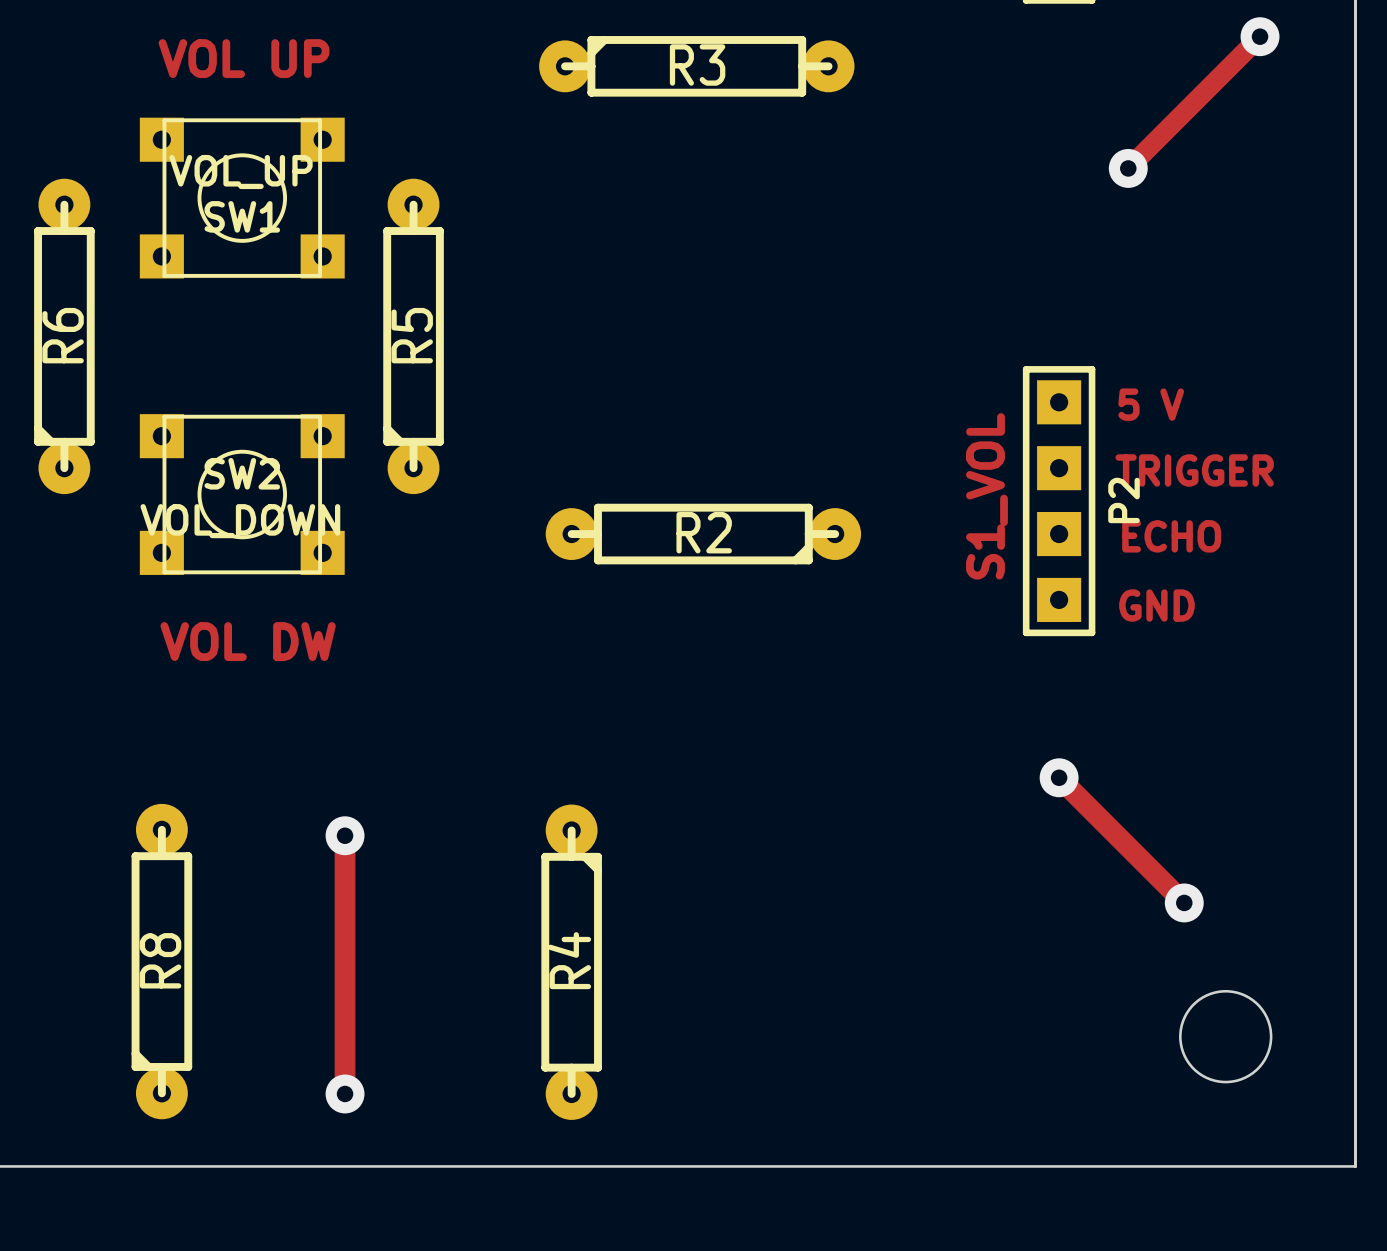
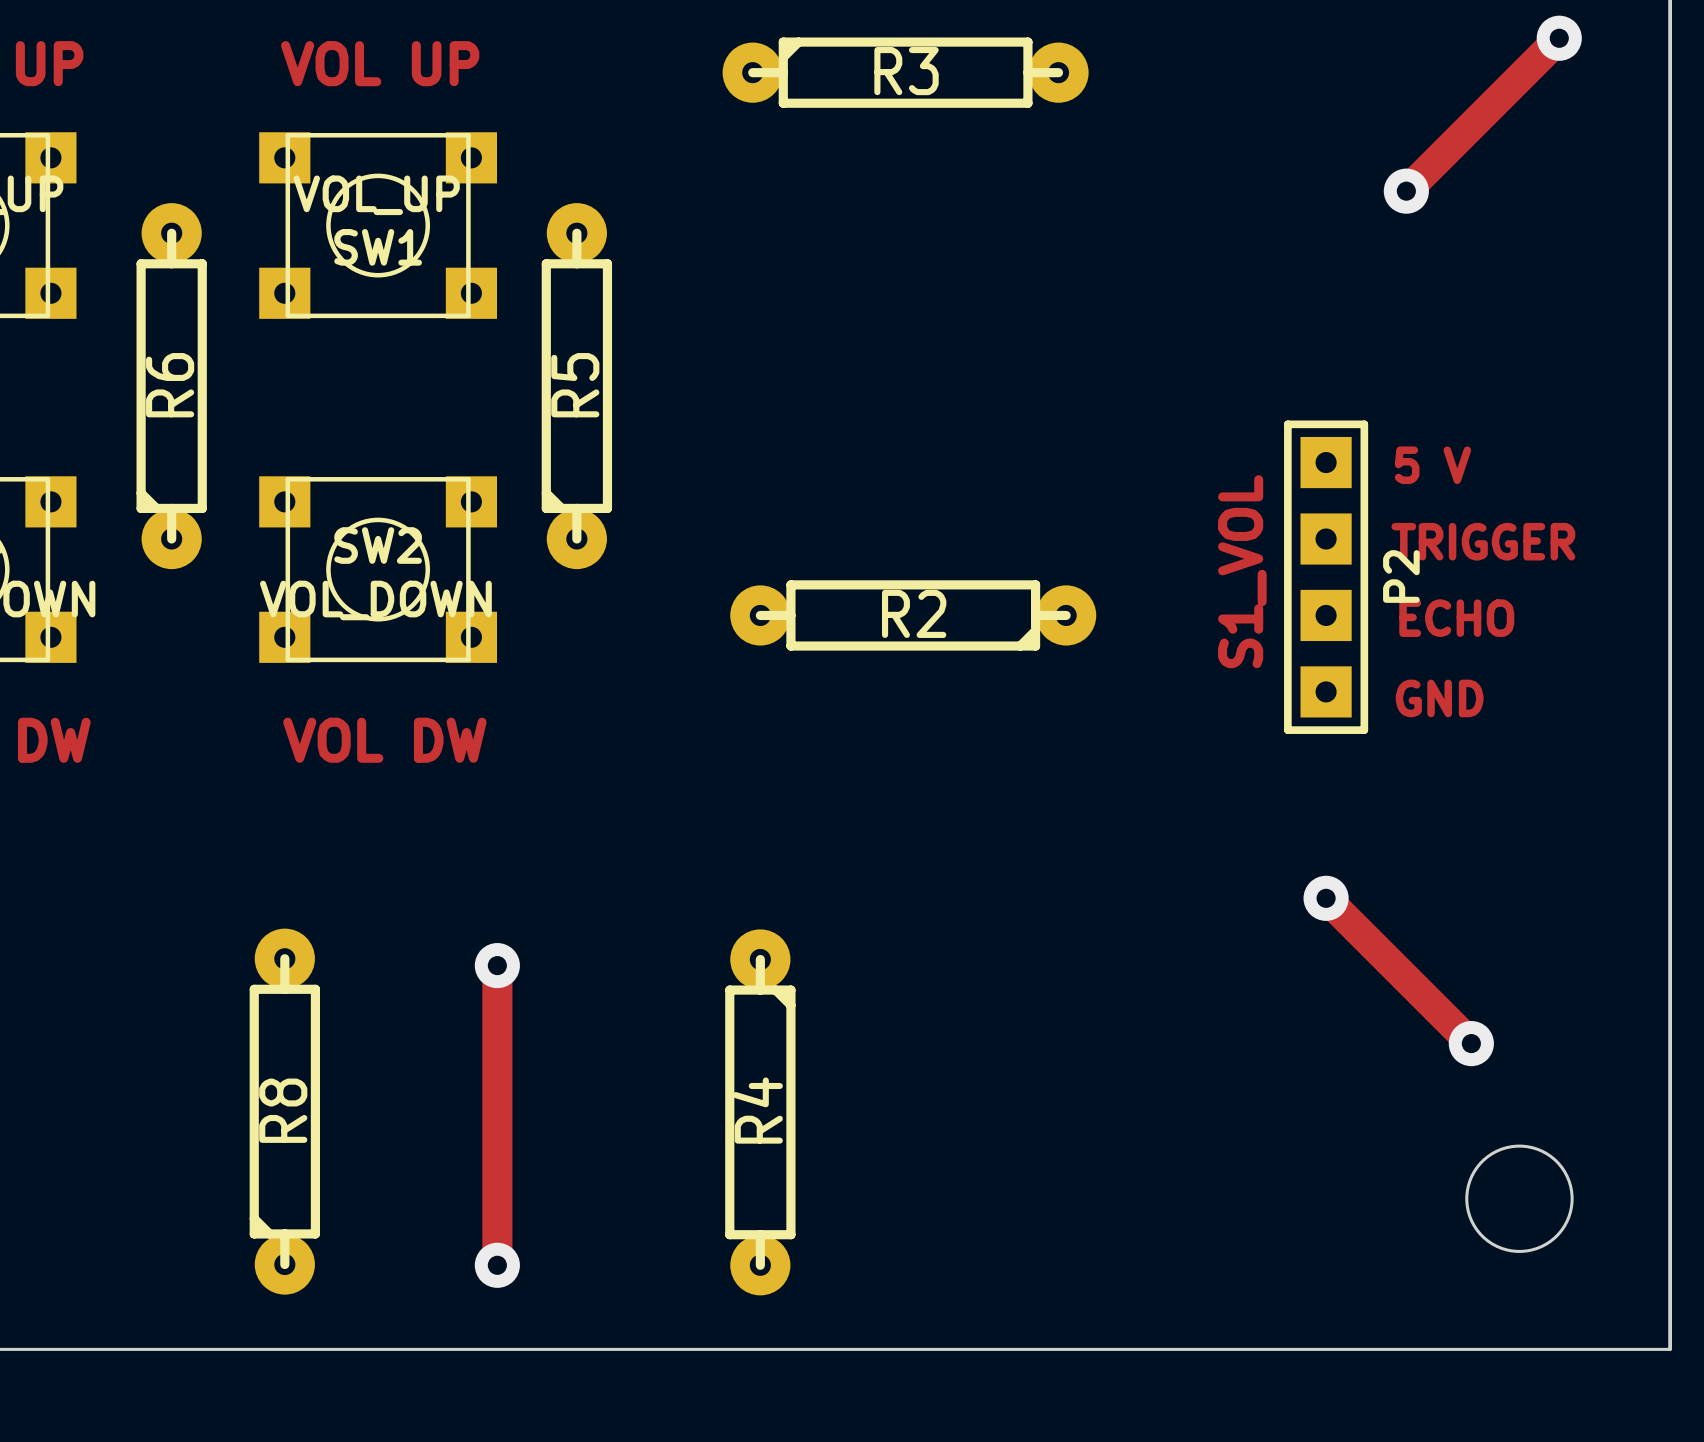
track width: thin (1260, 36) (1128, 168) -> thick (1559, 38) (1406, 191)
track width: thin (1059, 777) (1184, 902) -> thick (1326, 898) (1471, 1043)
track width: thin (345, 835) (345, 1093) -> thick (497, 965) (497, 1265)

